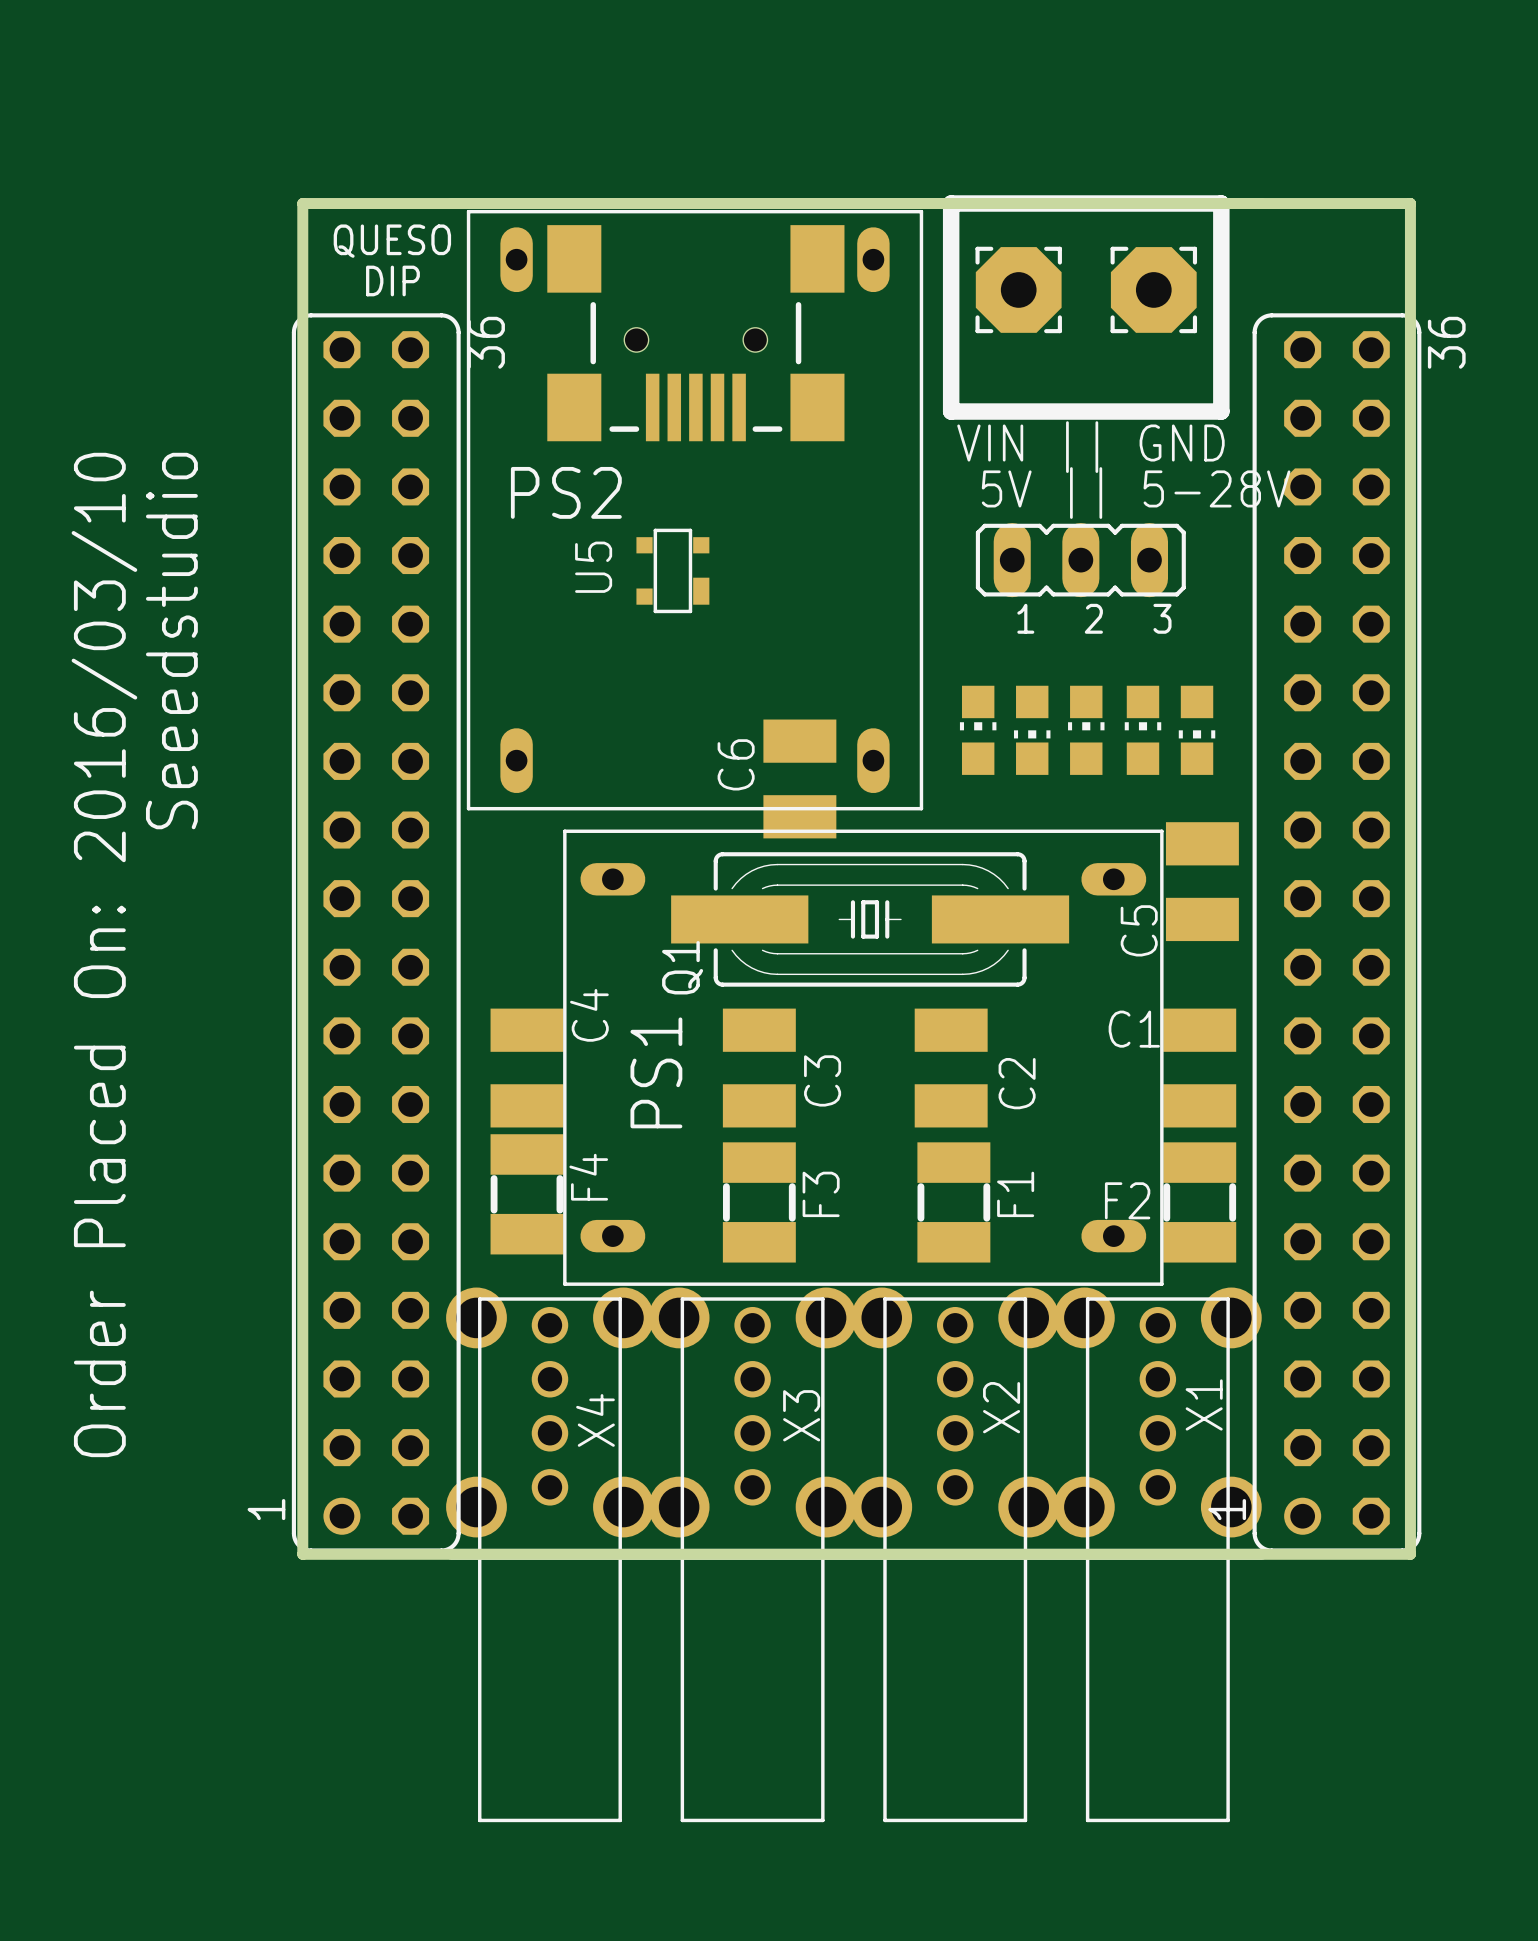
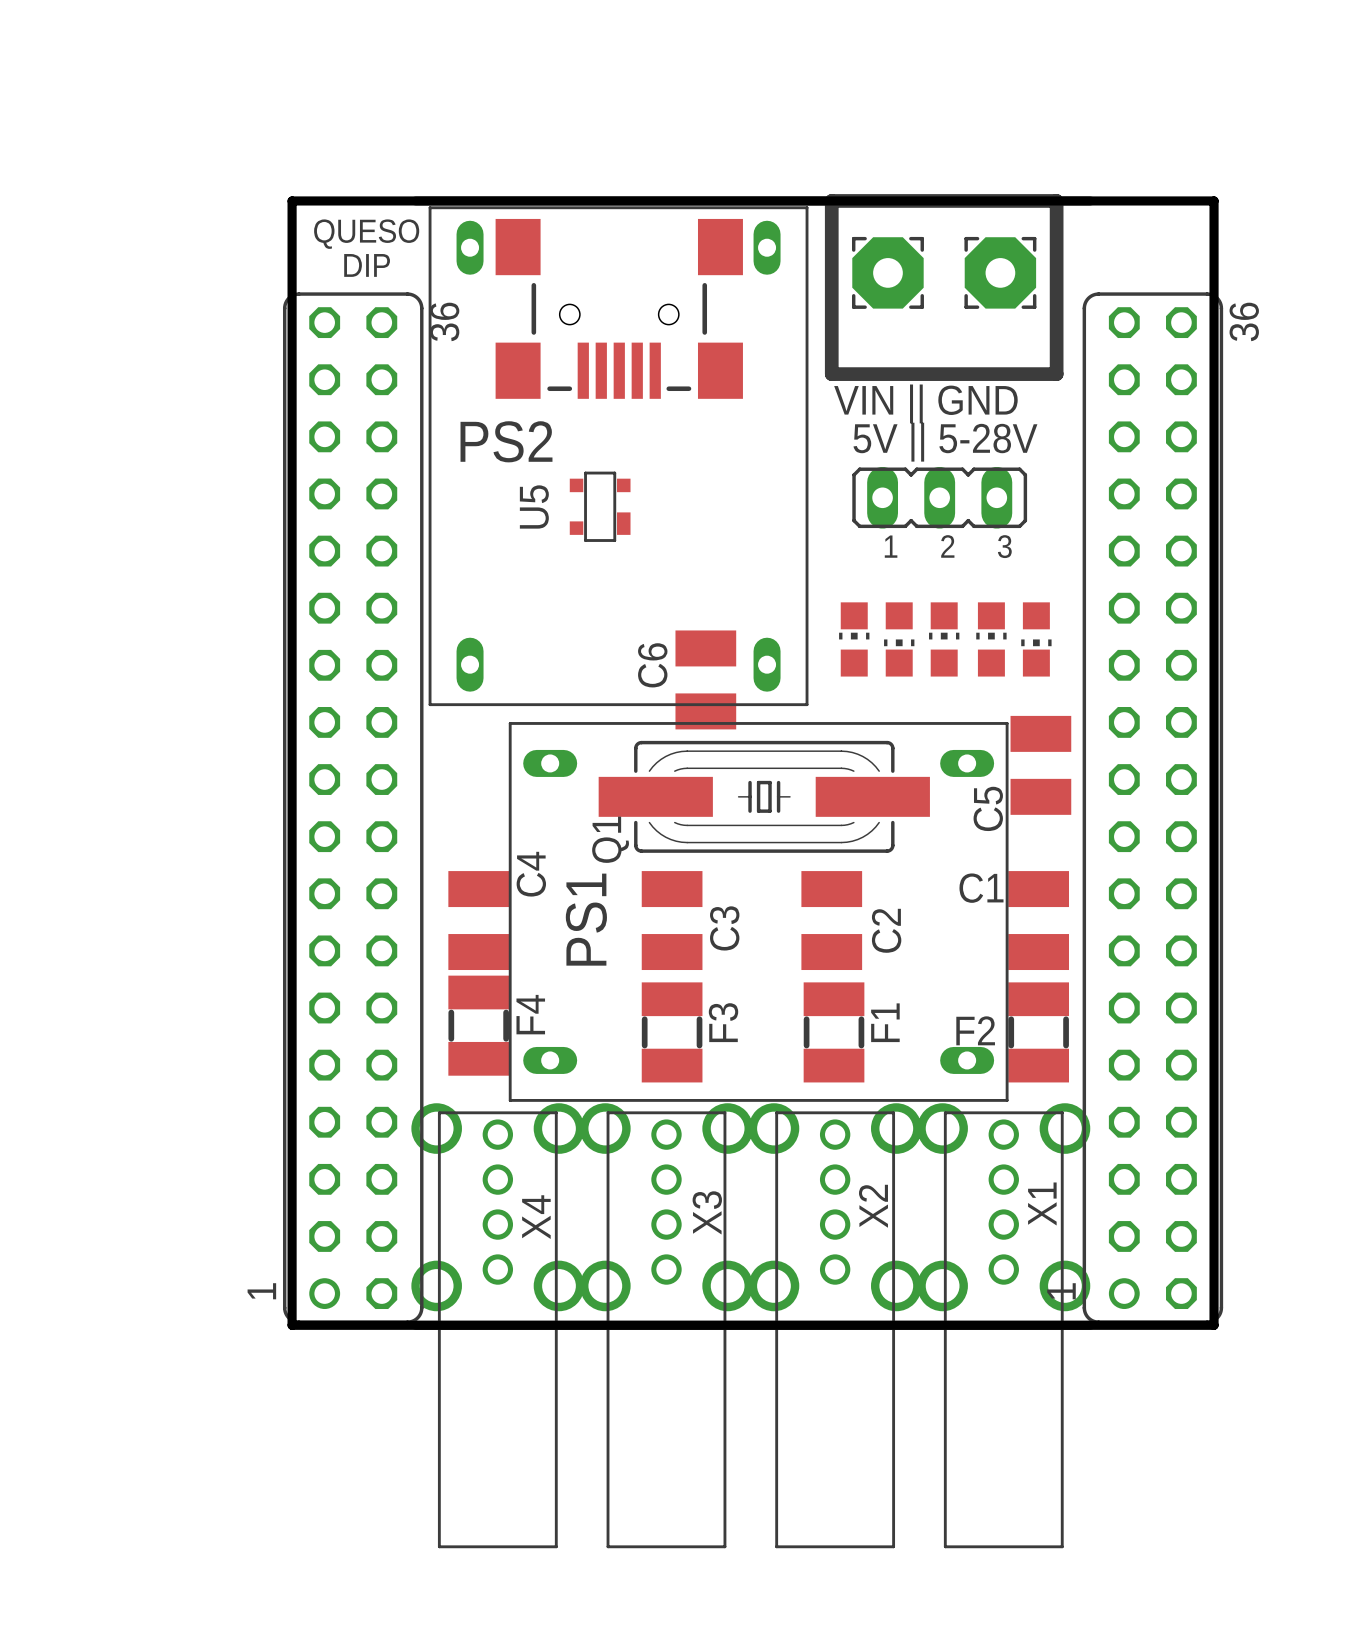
text: Seeedstudio (171, 641) -> none
text: Order Placed On: 2016/03/10 (104, 954) -> none

